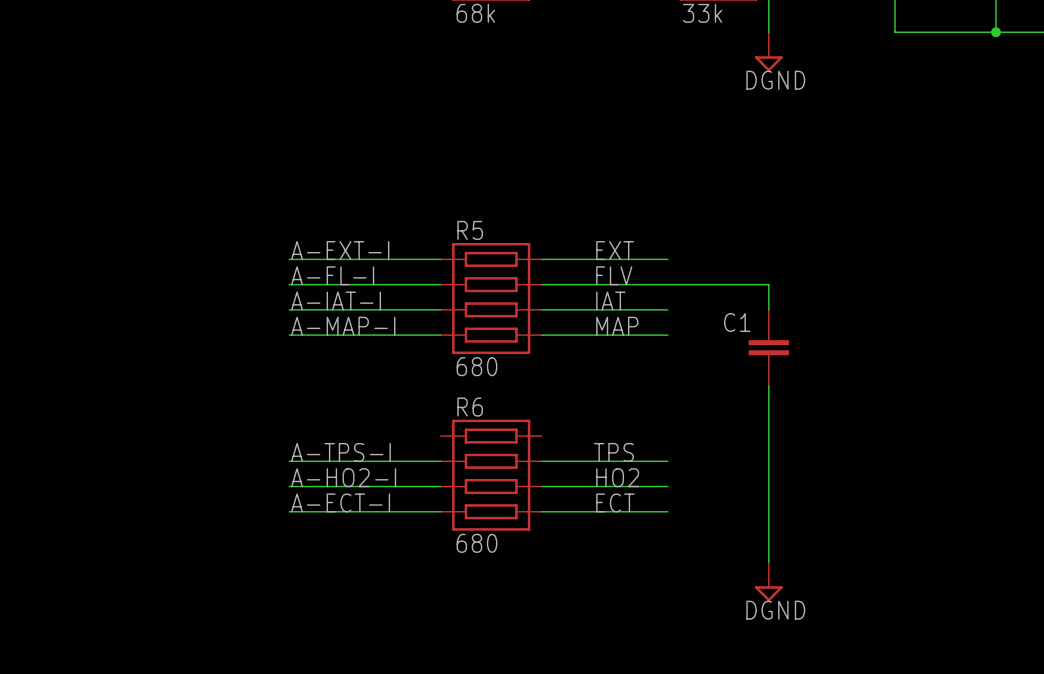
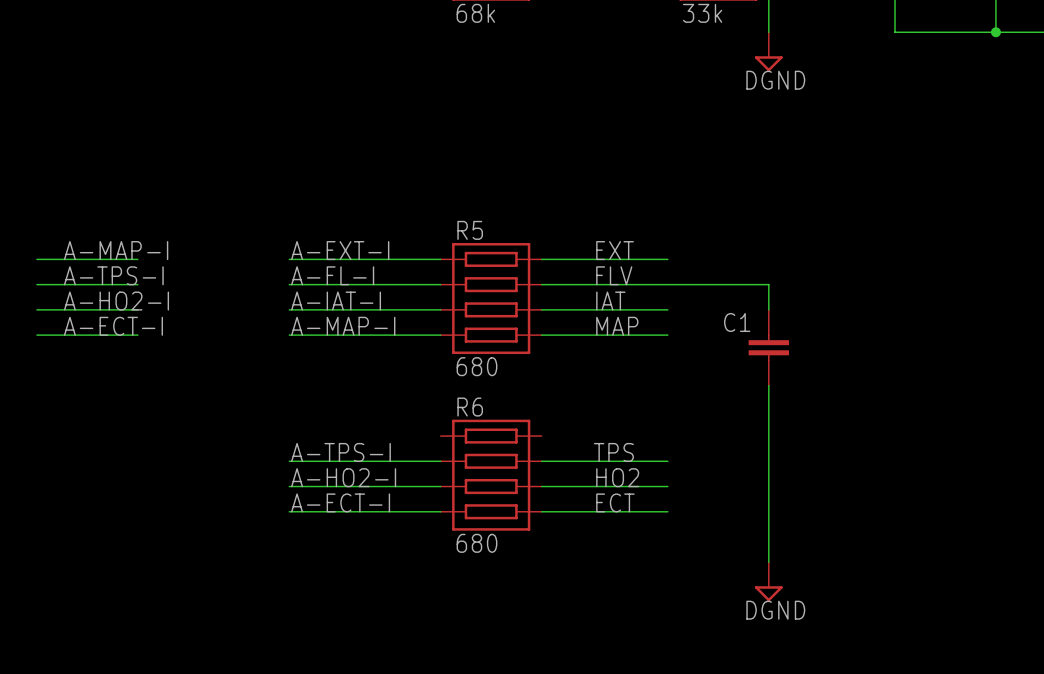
label: none -> A-MAP-I (116, 250)
wire: none -> (36, 259) (137, 259)
label: none -> A-TPS-I (113, 275)
wire: none -> (36, 284) (137, 284)
label: none -> A-HO2-I (116, 301)
wire: none -> (36, 309) (137, 309)
label: none -> A-ECT-I (113, 326)
wire: none -> (36, 335) (137, 335)

